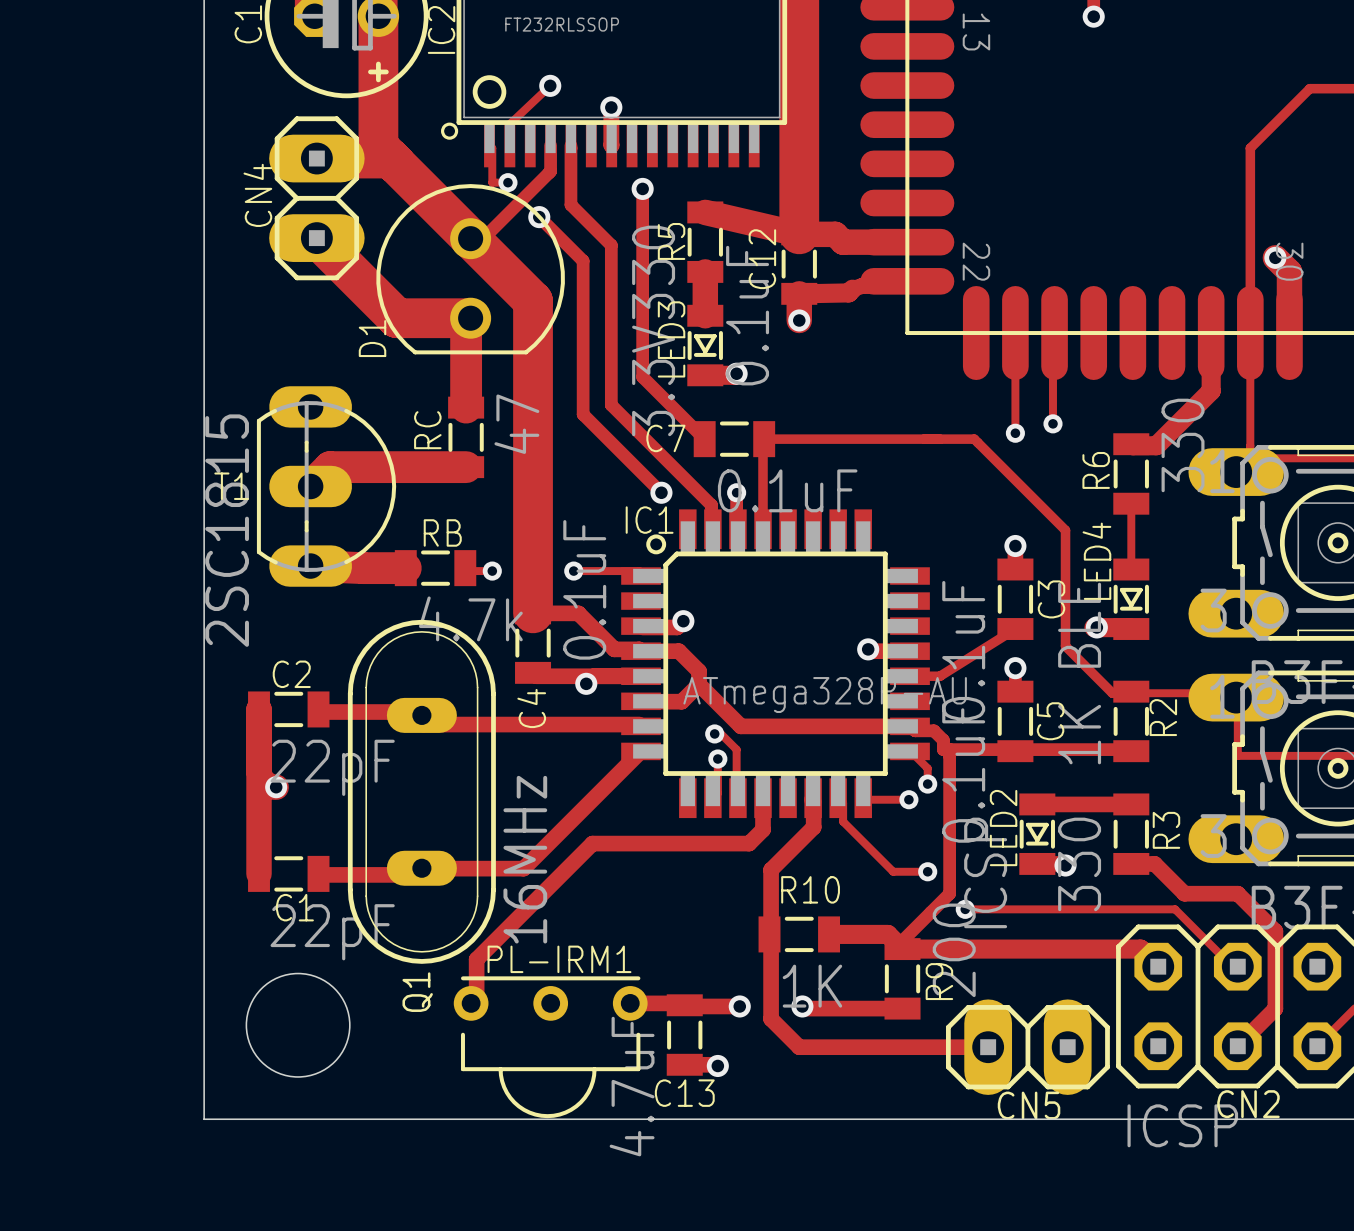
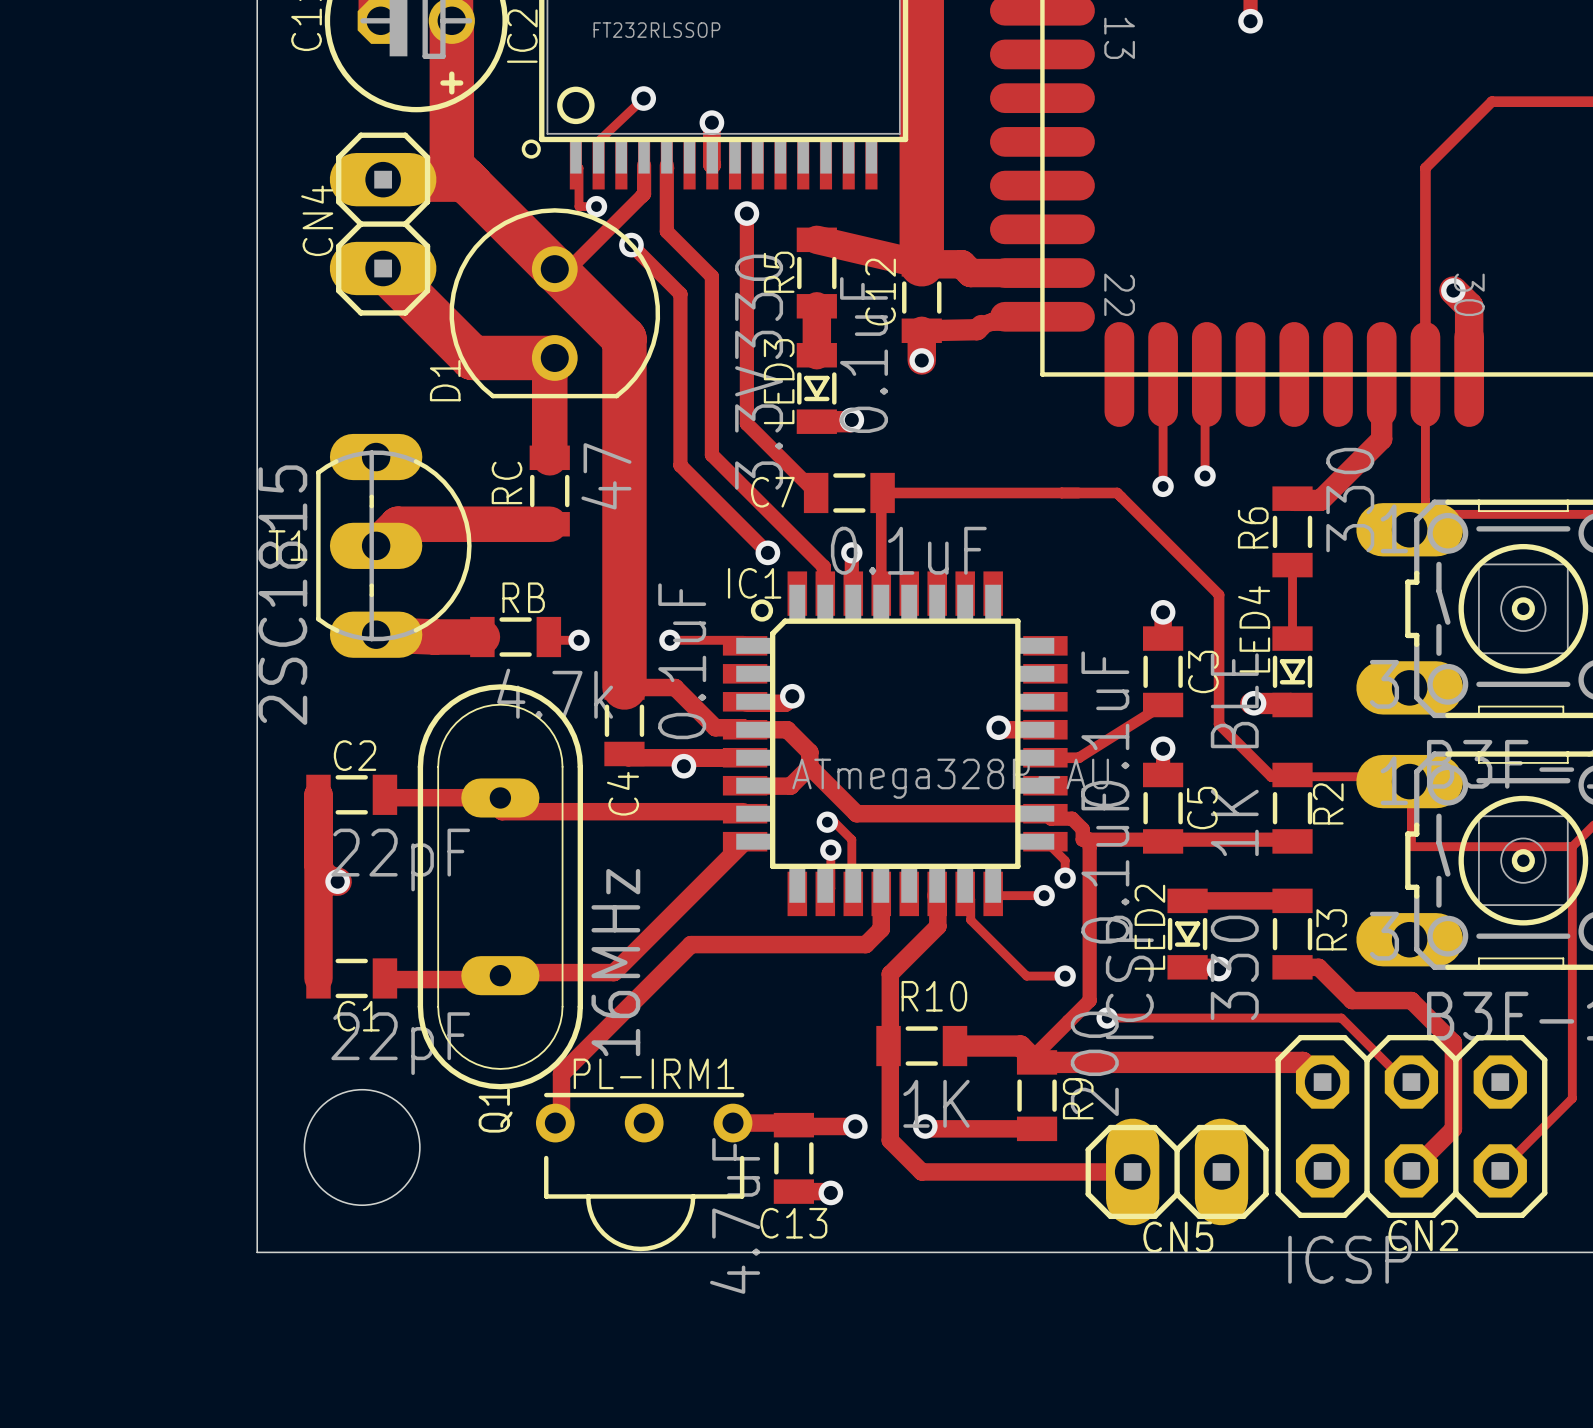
Q1 footprint: [347, 619, 496, 964] -> [417, 684, 583, 1090]

